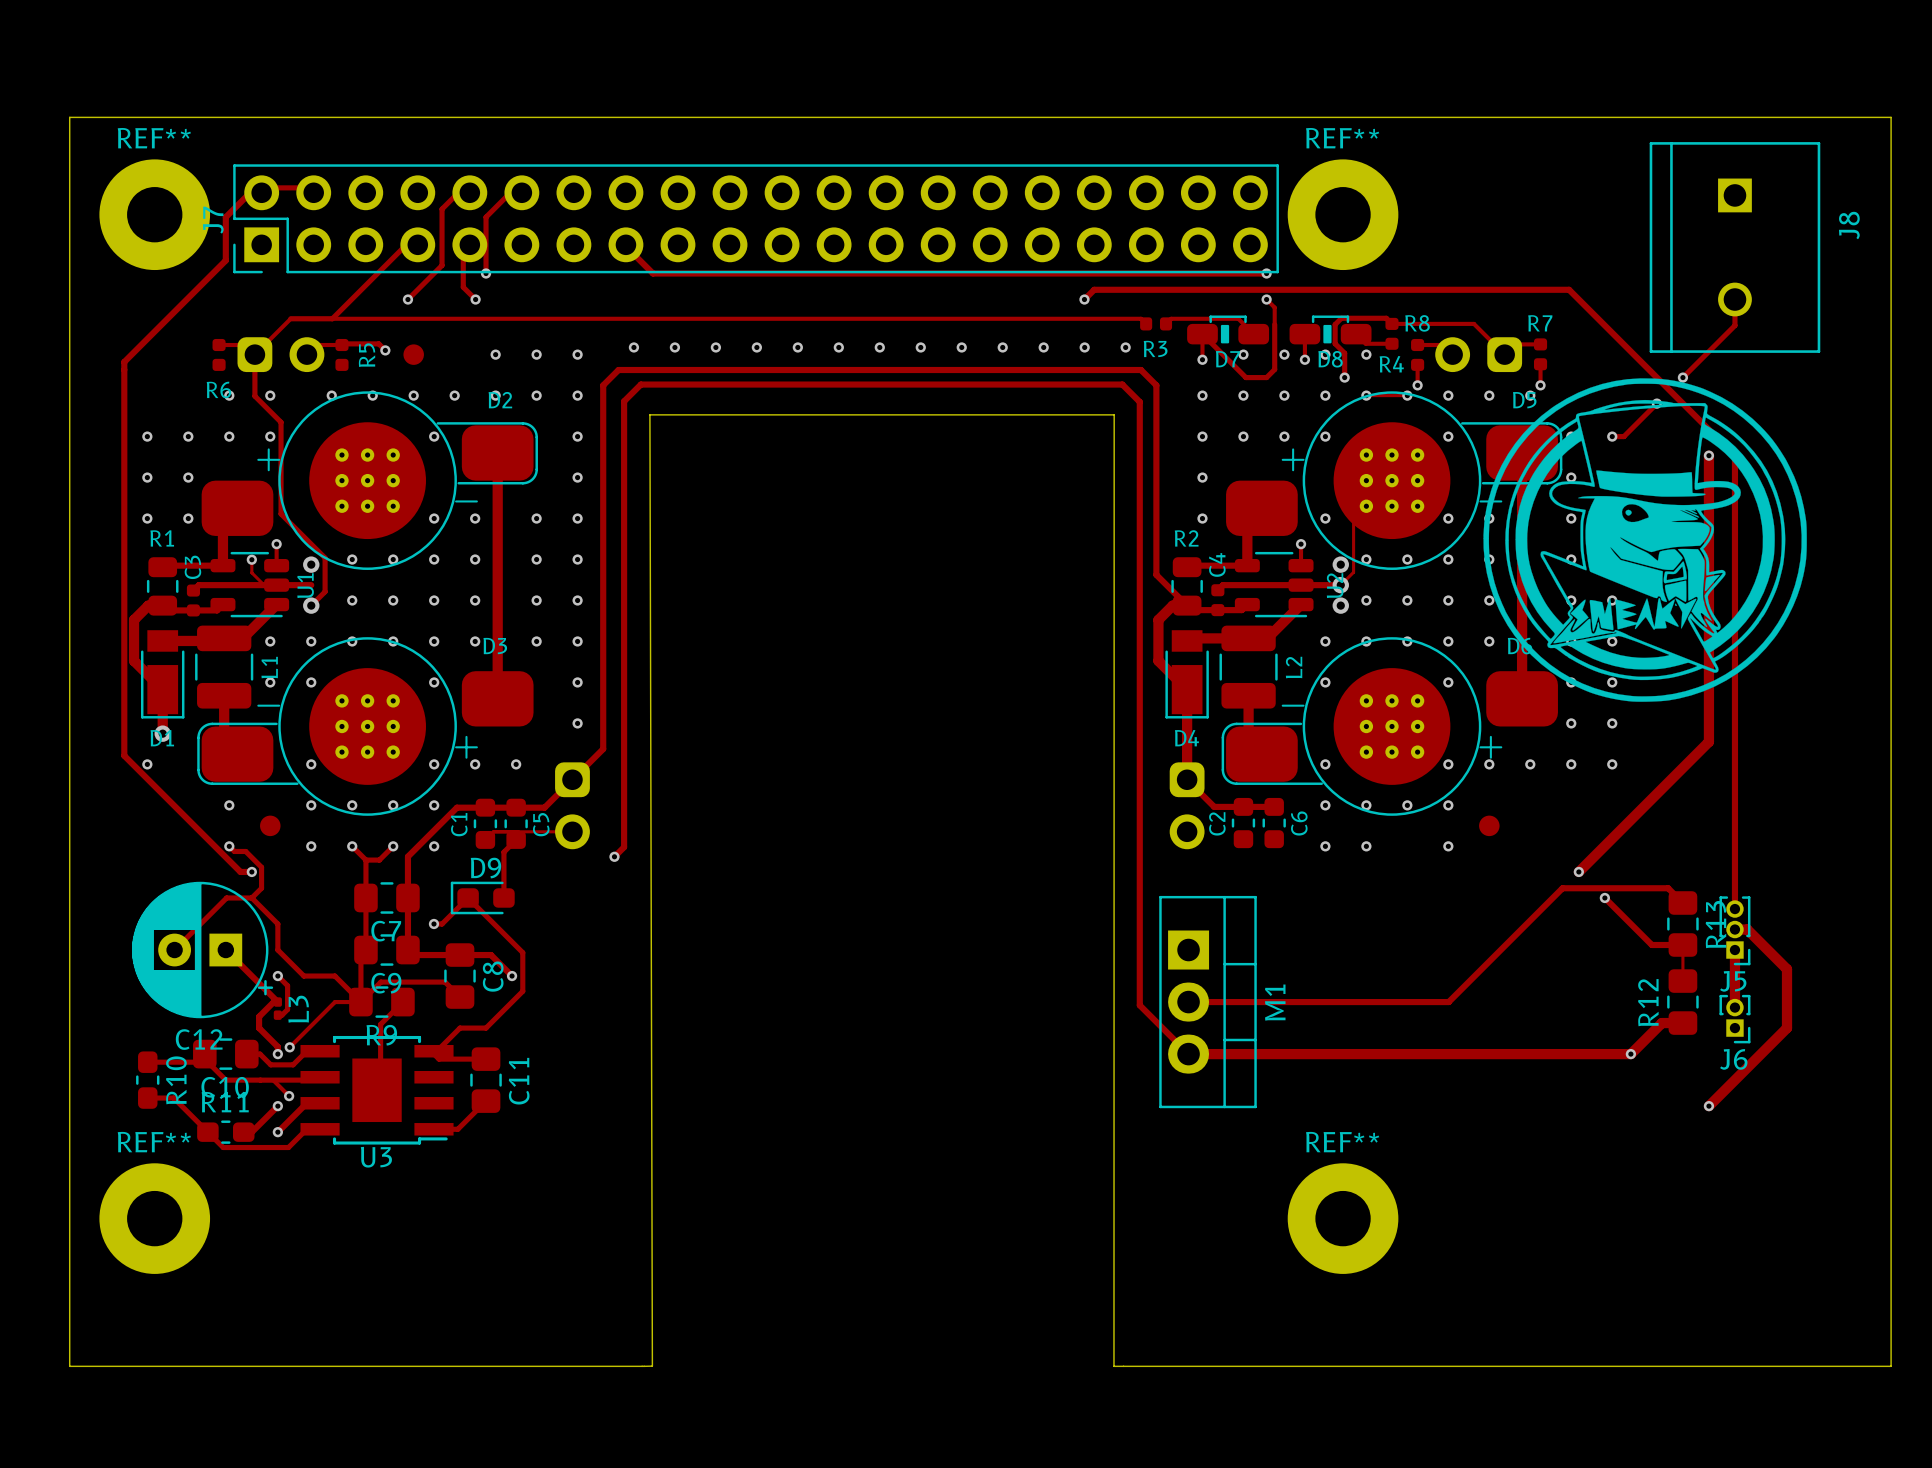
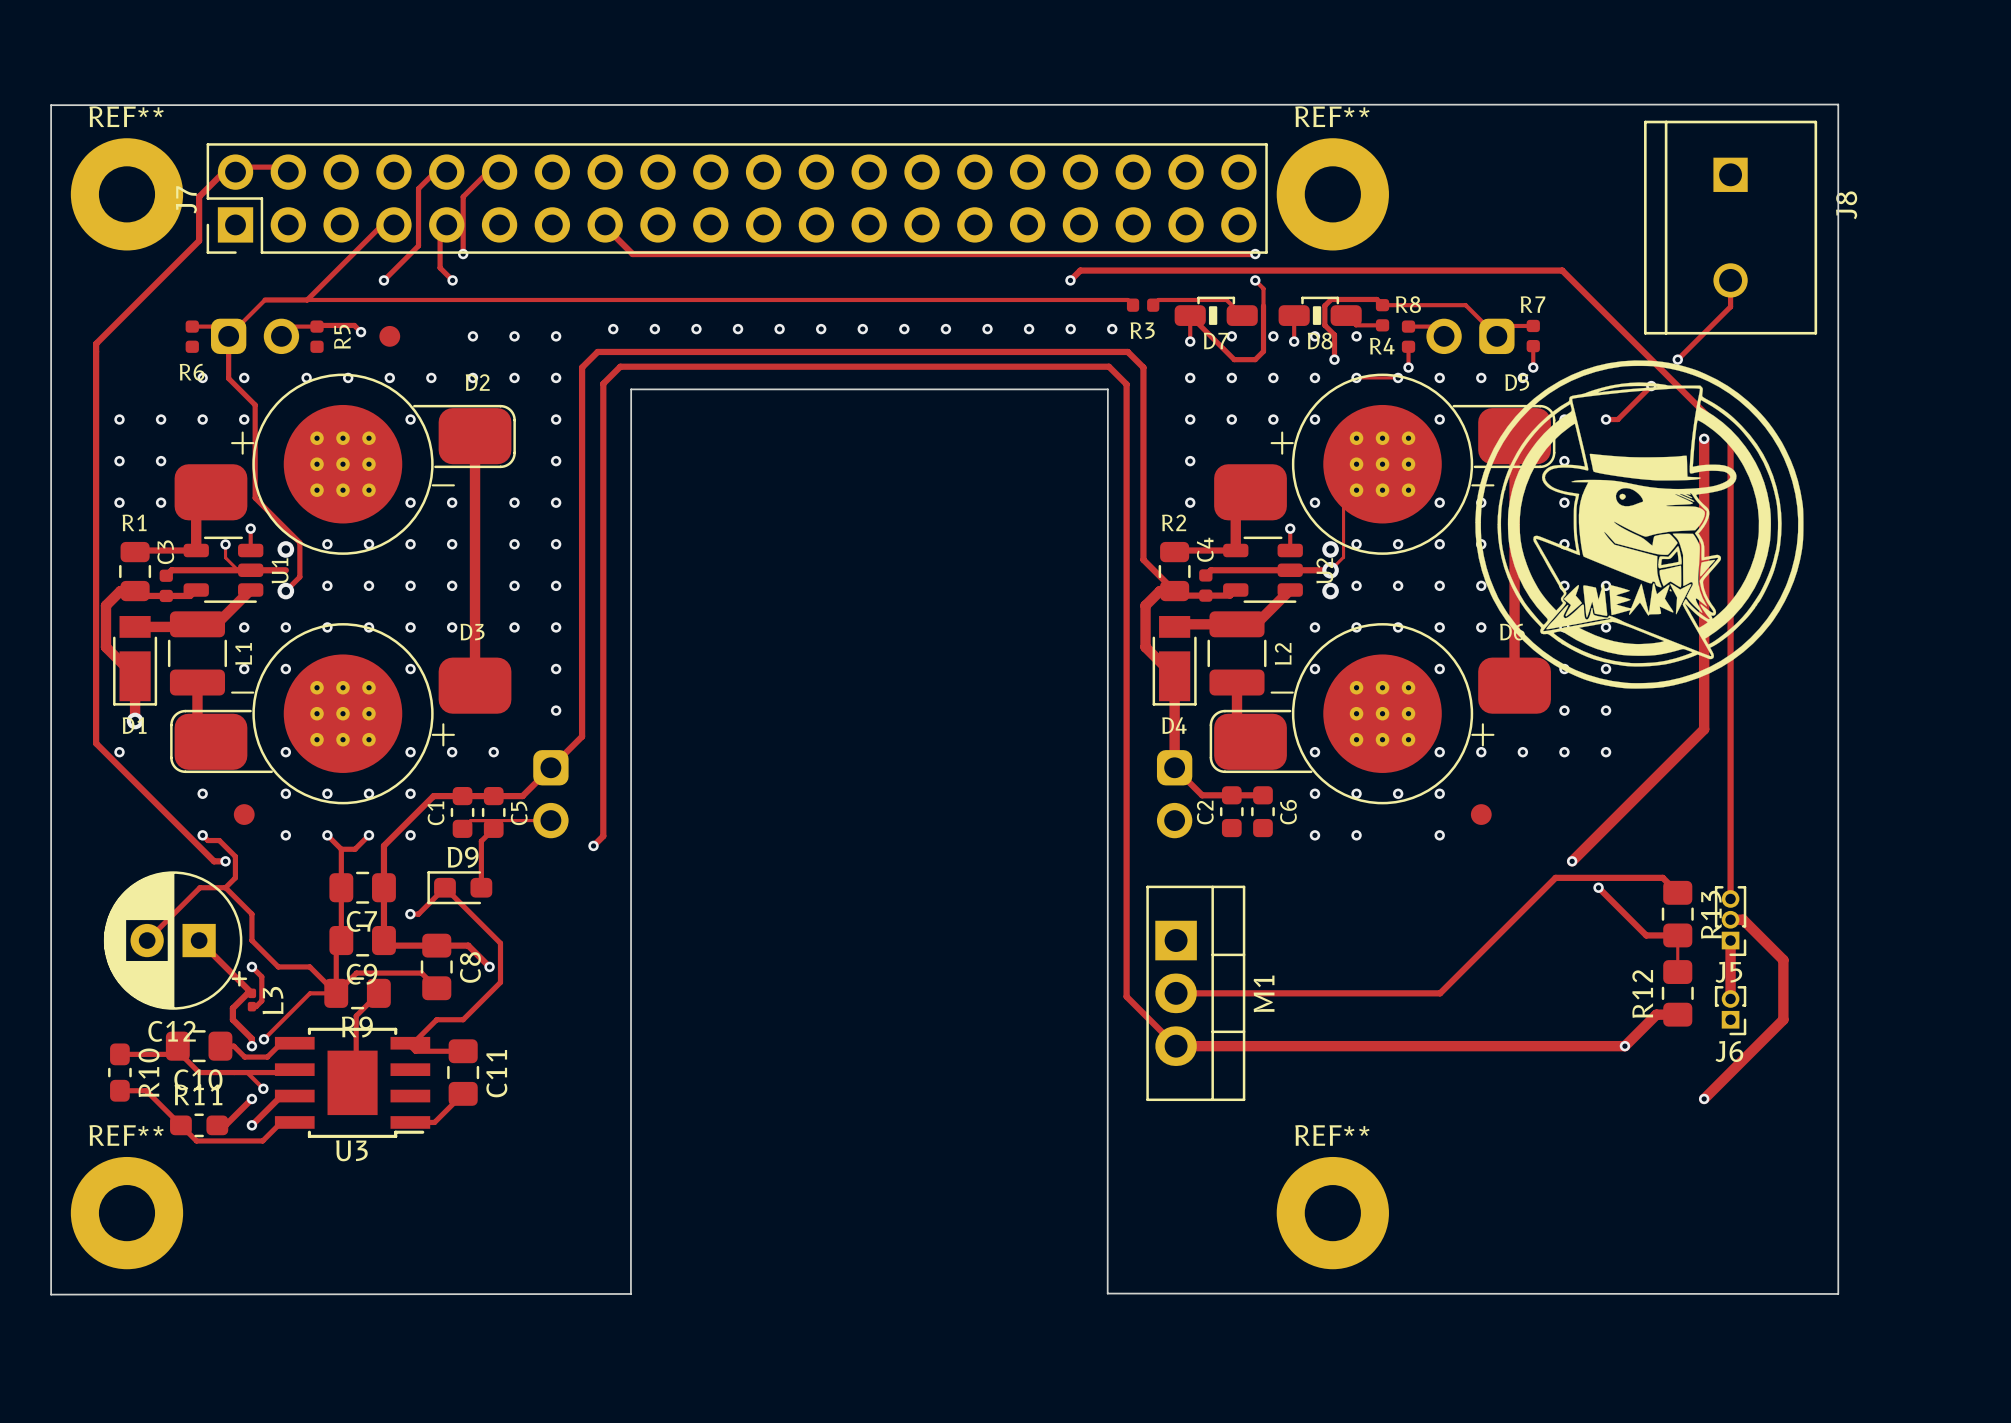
board edge: (69, 117) (69, 1366) (652, 1366) (649, 414) (1114, 414) (1113, 1366) (1891, 1366) (1891, 117) (69, 117) -> (1838, 104) (51, 105) (51, 1294) (630, 1293) (631, 389) (1107, 389) (1107, 1293) (1838, 1293) (1838, 104)

